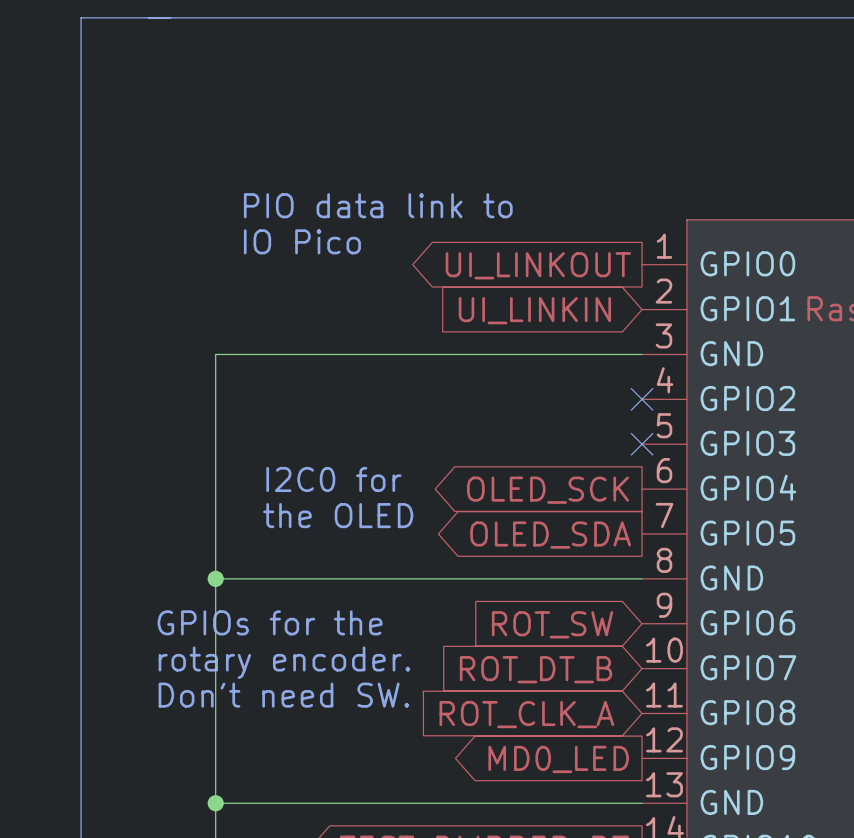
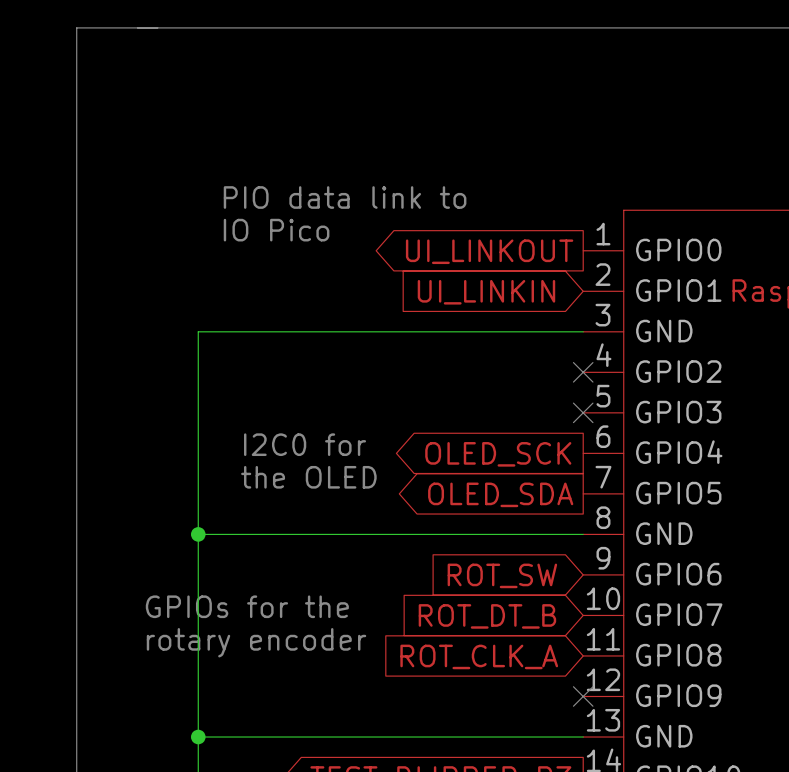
text: GPIOs for the (270, 622) -> none
text: rotary encoder. (284, 662) -> GPIOs for the (247, 606)
text: Don't need SW. (283, 695) -> rotary encoder (256, 642)
no-connect mark: none -> (583, 696)
global label: MD0_LED (558, 759) -> none

